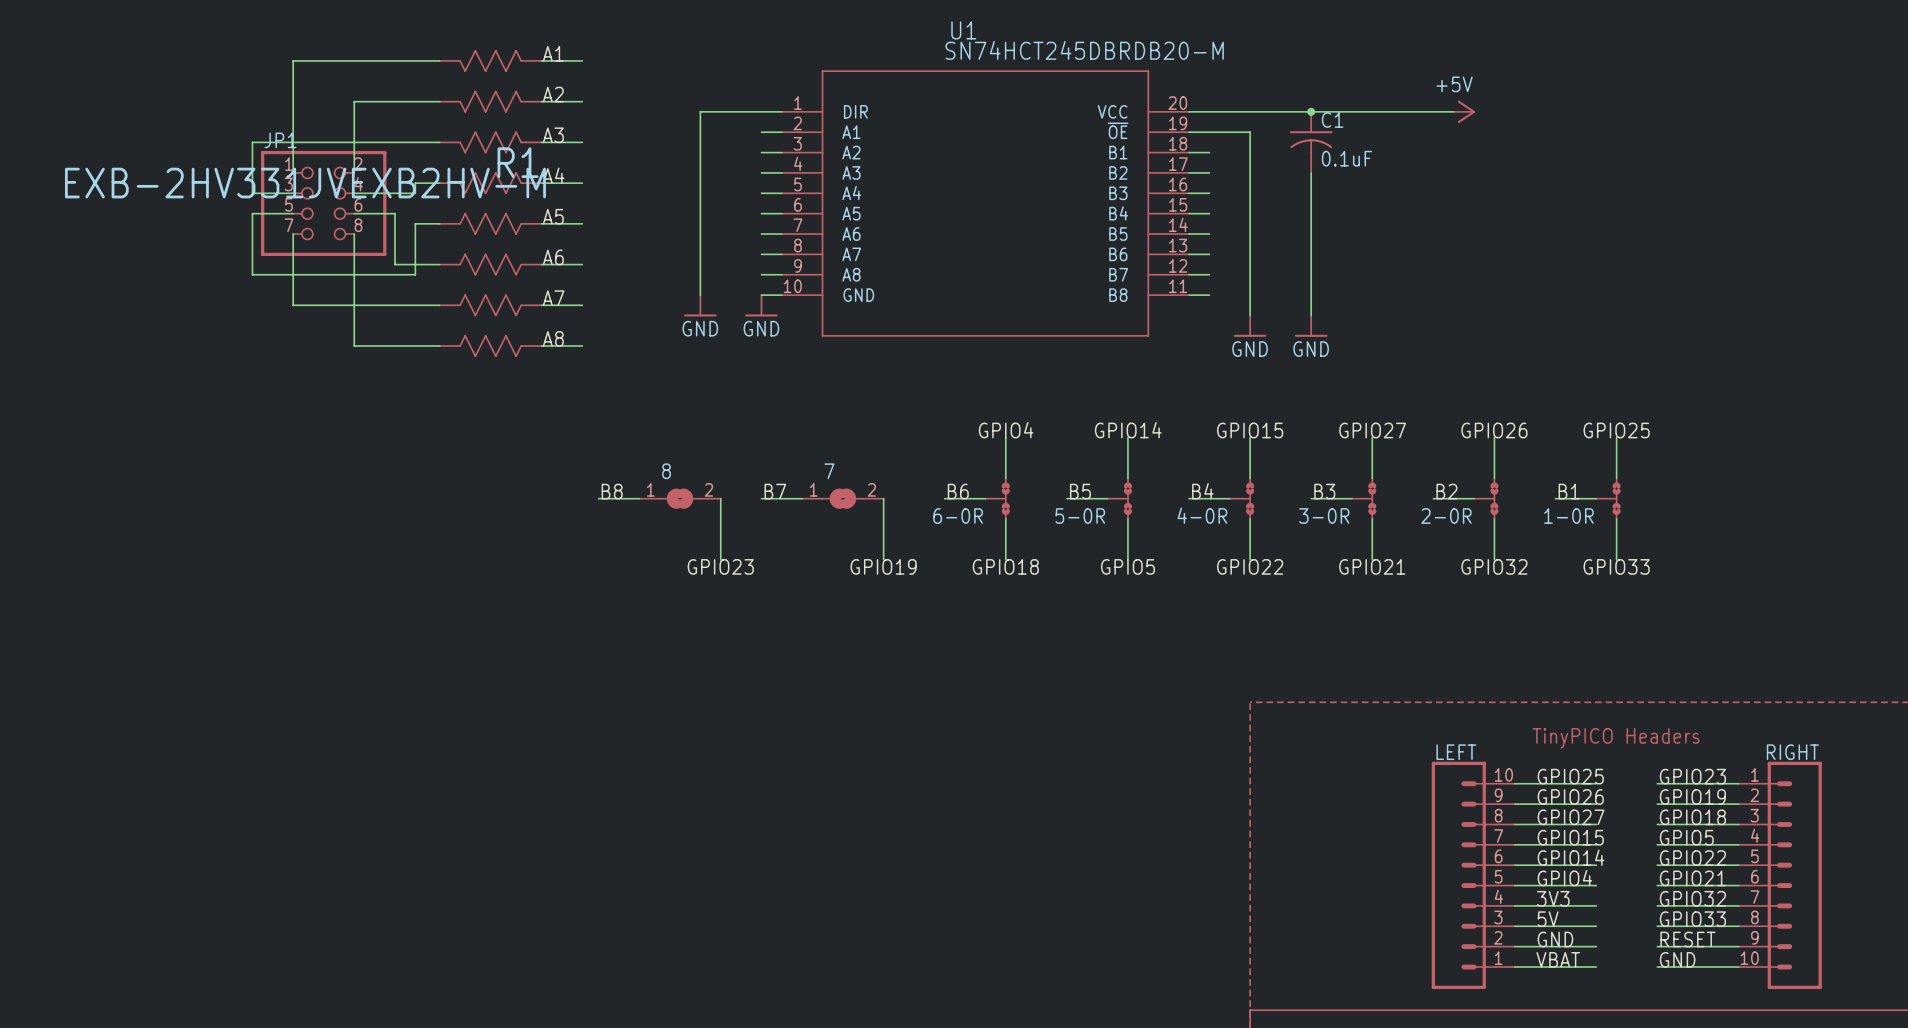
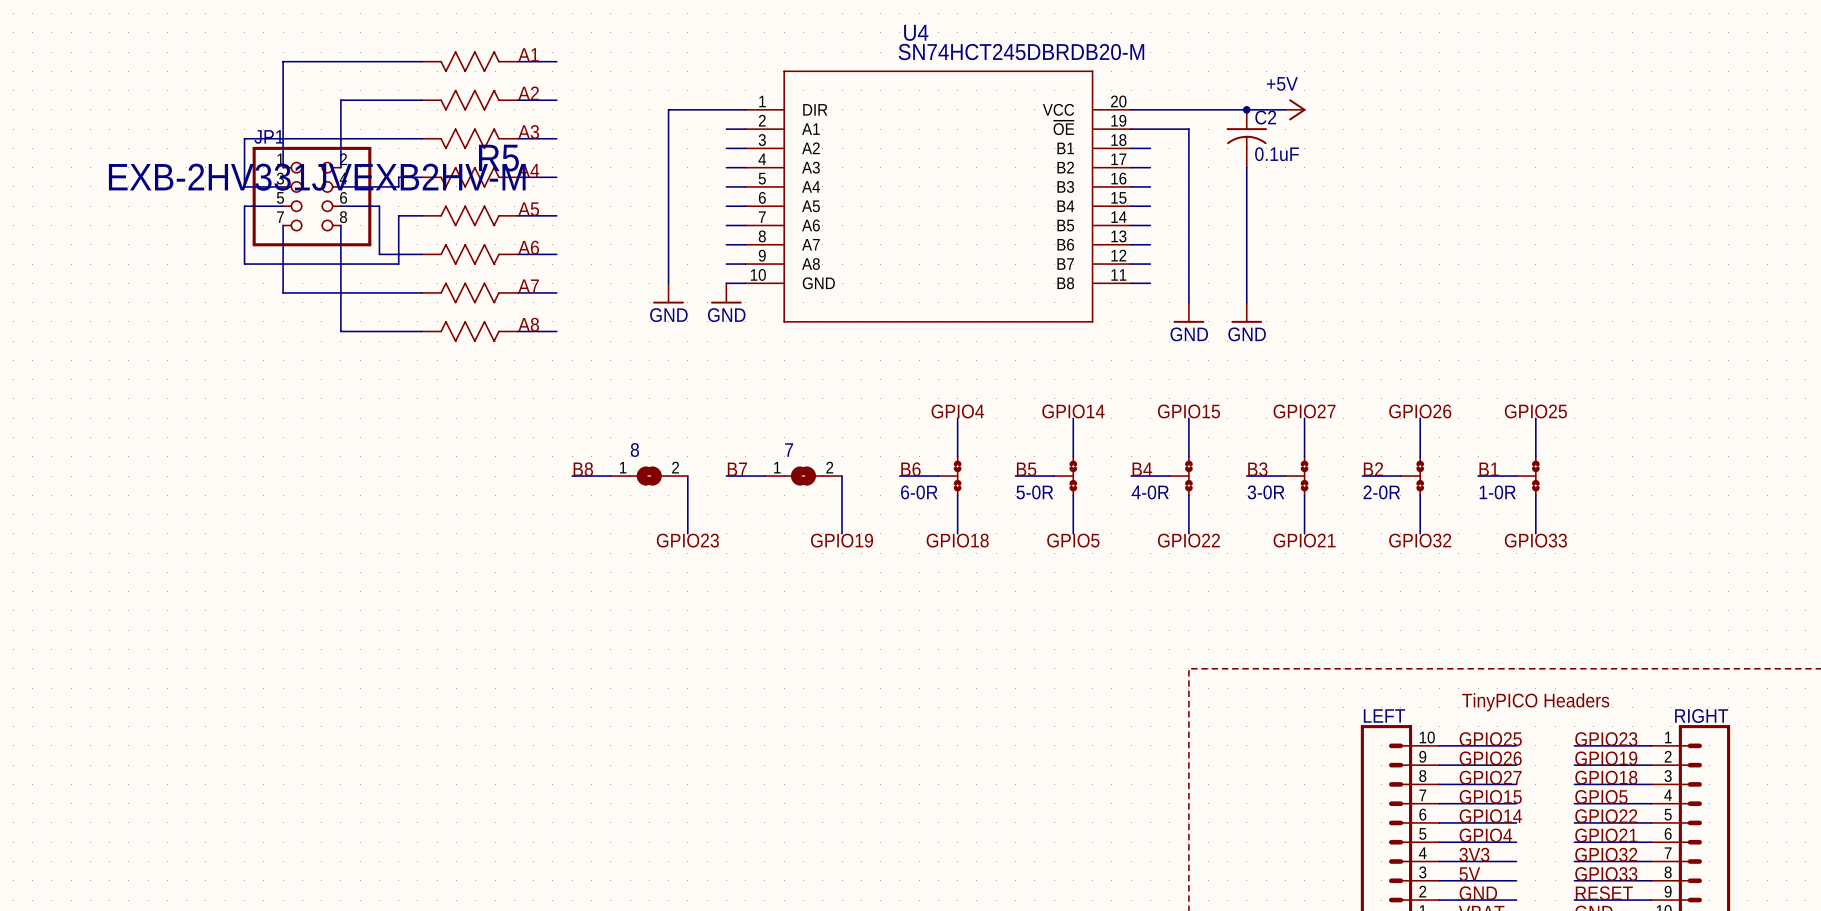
U1 name: U1 (963, 30) -> U4 (916, 32)
wire: (1351, 111) (1453, 111) -> none
power symbol position: +5V (1464, 111) -> +5V (1295, 109)
C1 name: C1 (1332, 120) -> C2 (1265, 117)
R1 name: R1 (518, 162) -> R5 (498, 158)

